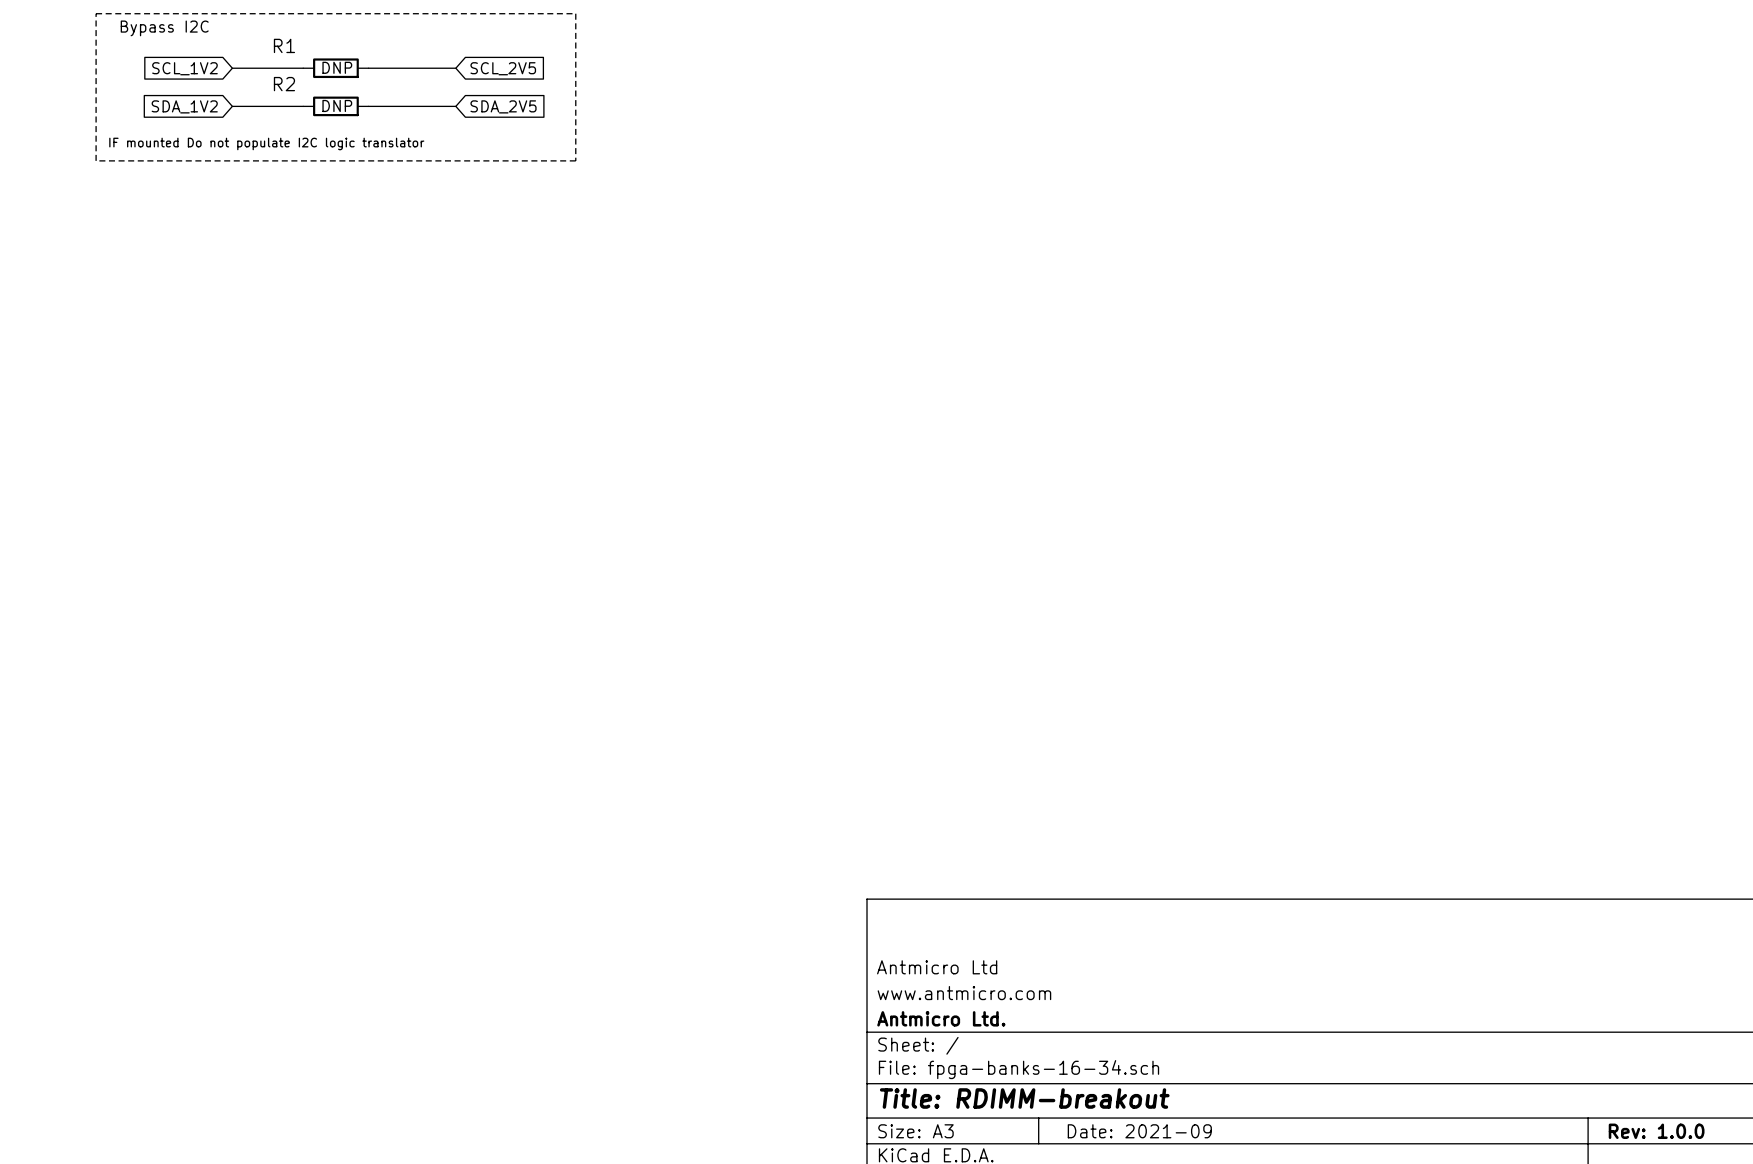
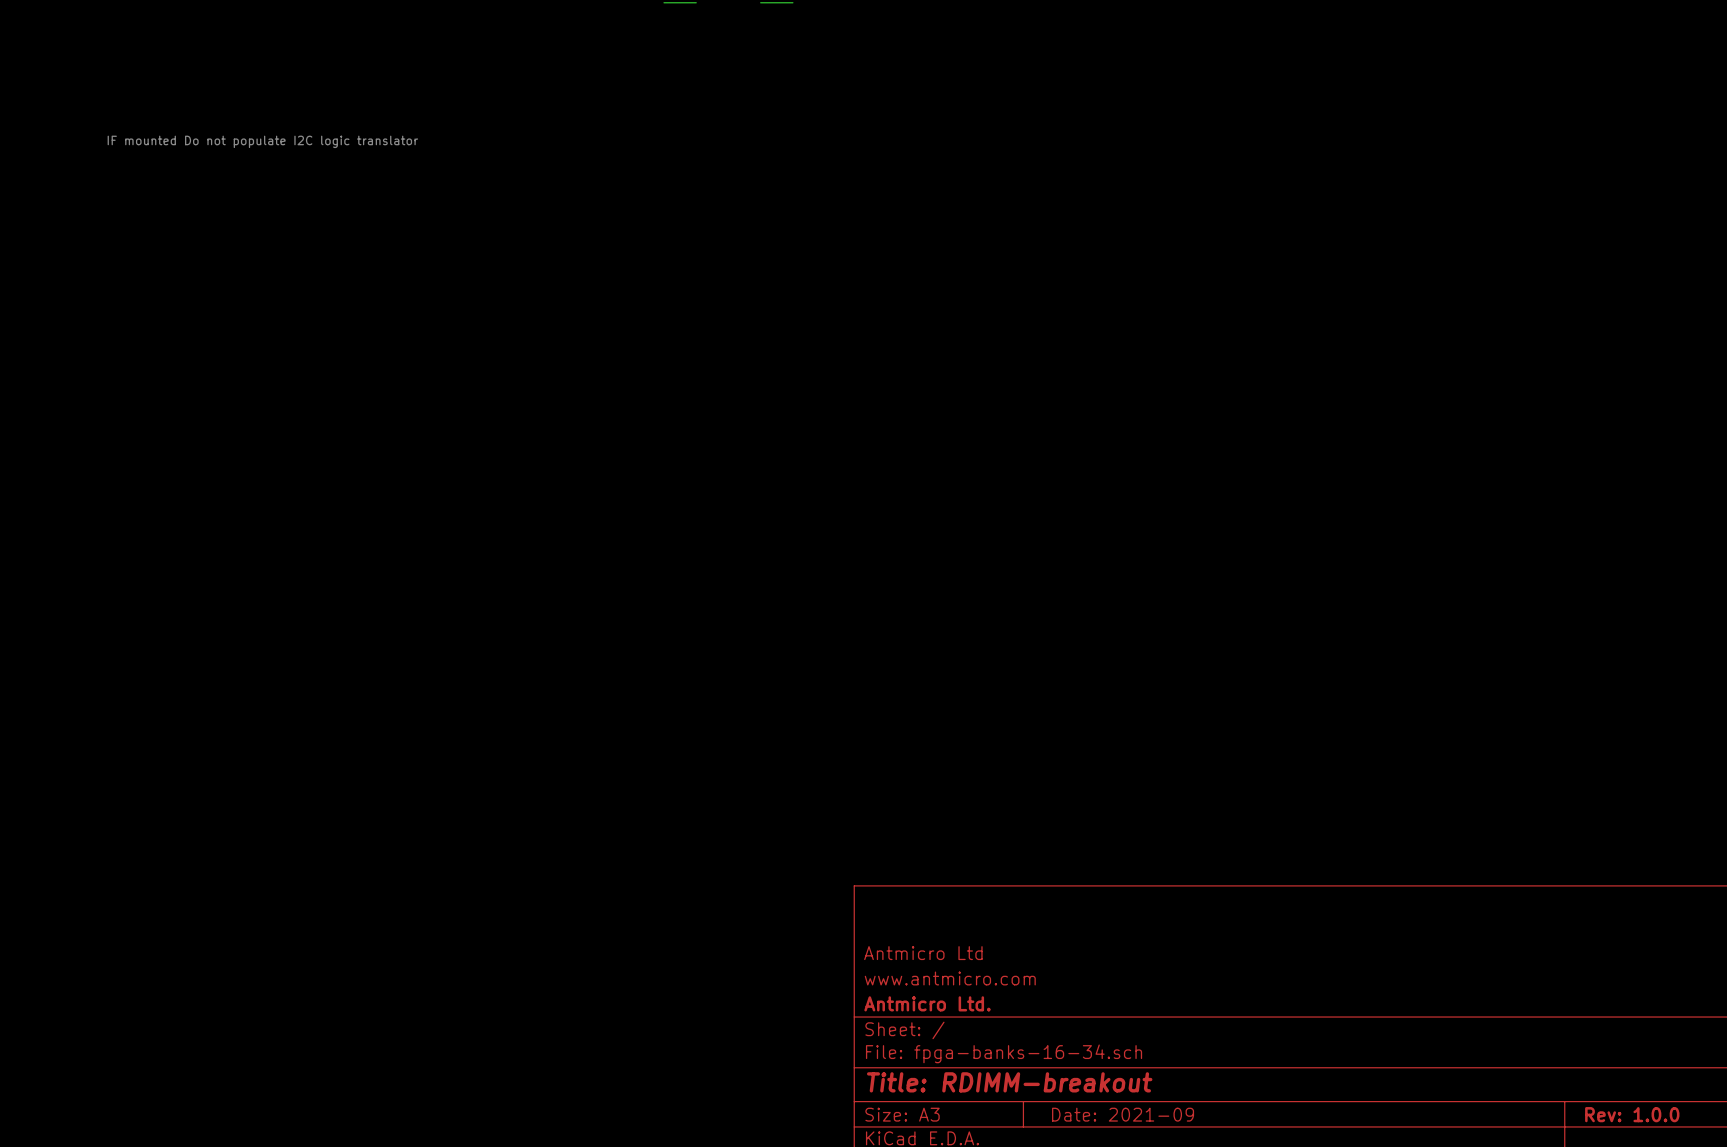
wire: none -> (663, 2) (696, 2)
wire: none -> (760, 2) (792, 2)
line: (96, 13) (575, 13) (575, 160) (96, 160) (96, 13) -> none
text: Bypass I2C (164, 28) -> none
global label: SCL_1V2 (184, 68) -> none
wire: (232, 68) (303, 68) -> none
R1: (335, 68) -> none
wire: (368, 68) (455, 68) -> none
global label: SCL_2V5 (503, 68) -> none
global label: SDA_1V2 (184, 106) -> none
wire: (232, 106) (303, 106) -> none
R2: (335, 106) -> none
wire: (368, 106) (455, 106) -> none
global label: SDA_2V5 (503, 106) -> none

